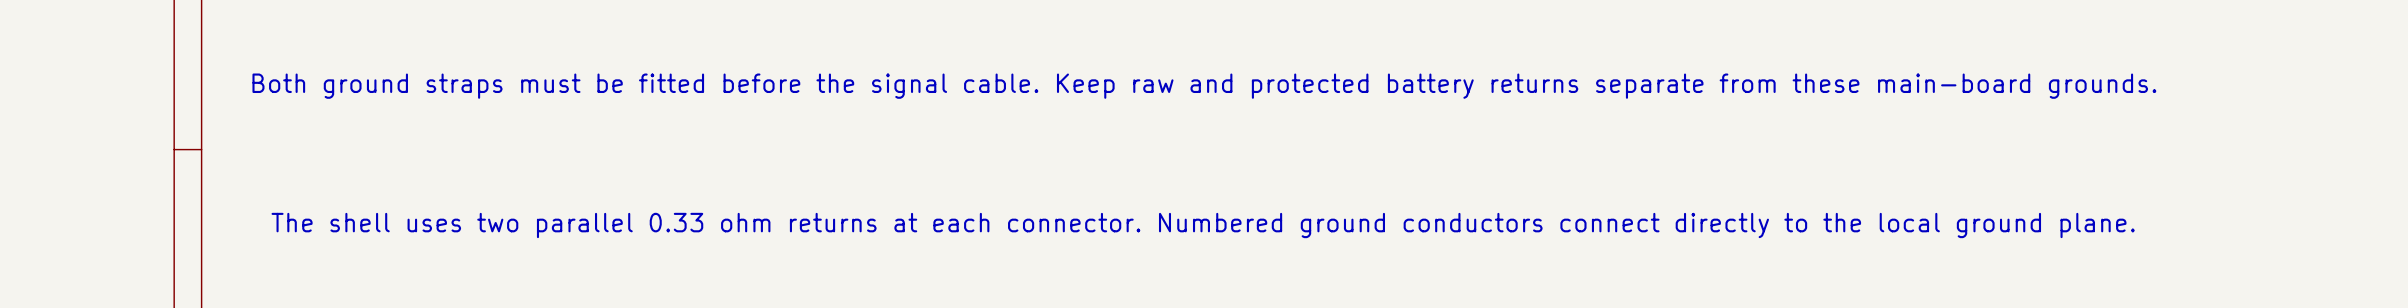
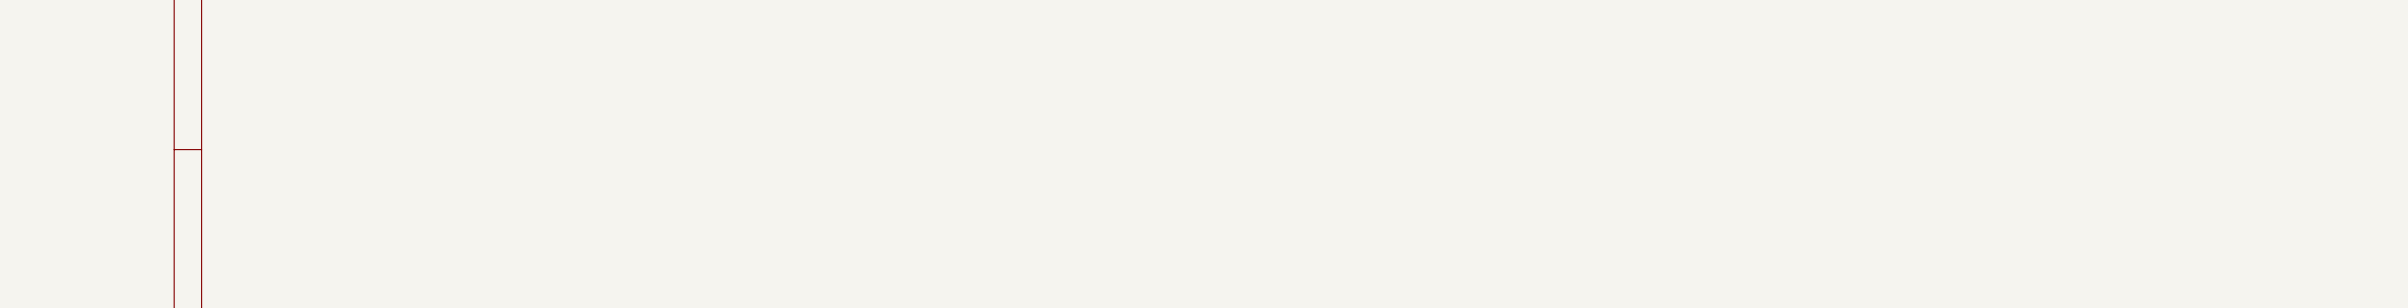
text: Both ground straps must be fitted before the signal cable. Keep raw and protected battery returns separate from these main-board grounds. (1204, 86) -> none
text: The shell uses two parallel 0.33 ohm returns at each connector. Numbered ground conductors connect directly to the local ground plane. (1203, 225) -> none

